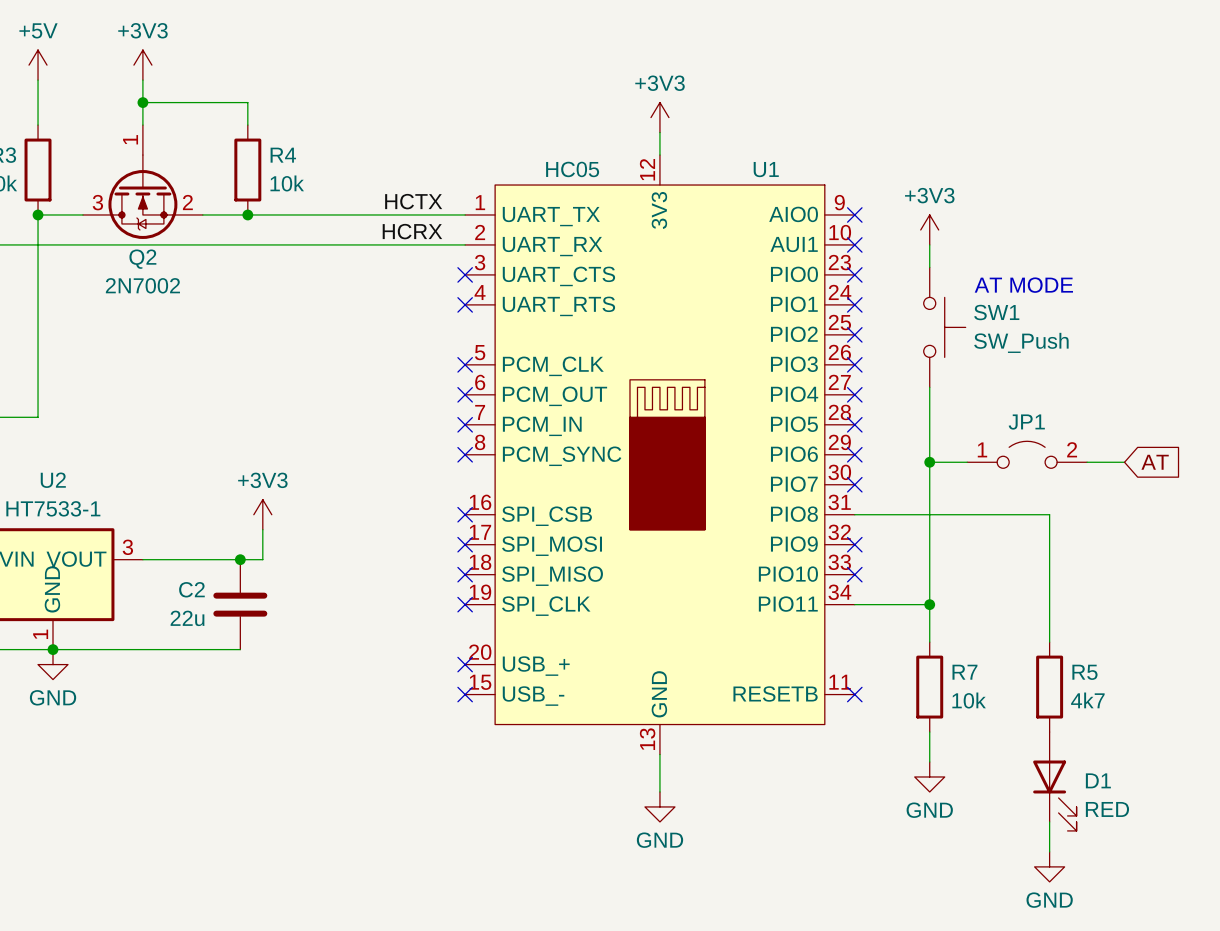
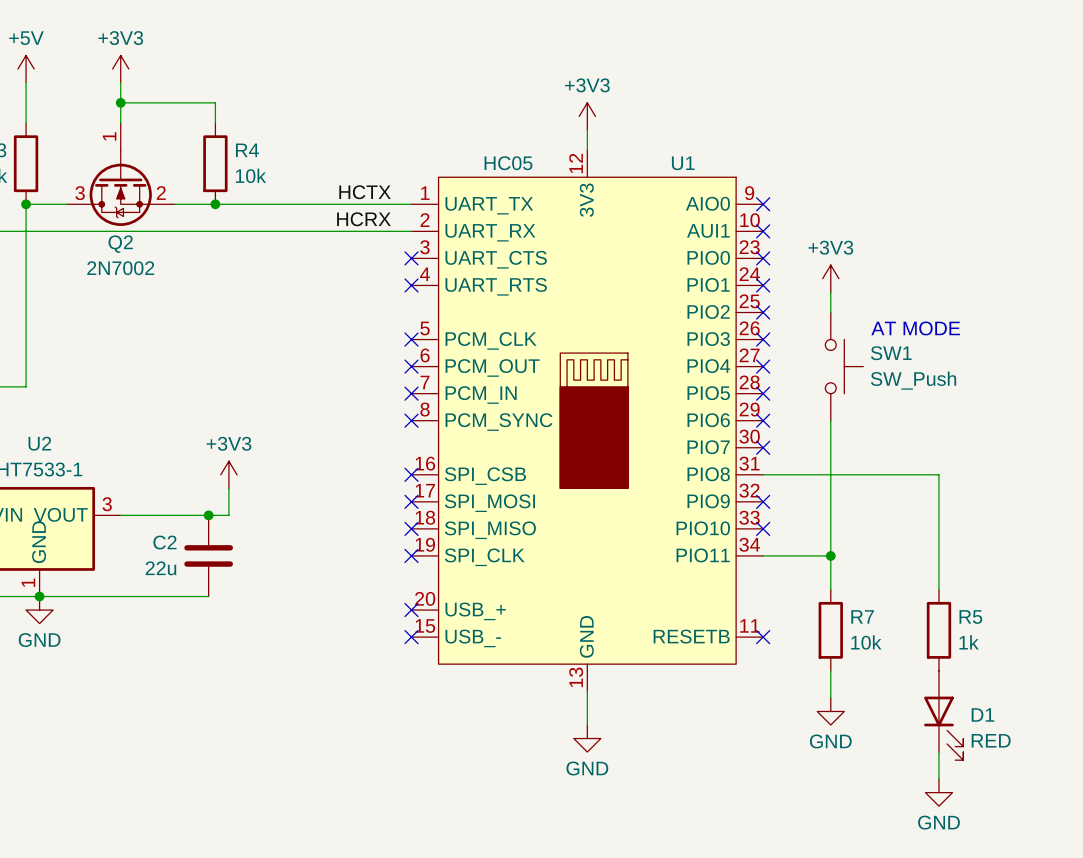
power symbol position: +3V3 (929, 229) -> +3V3 (830, 278)
wire: (929, 244) (929, 267) -> (830, 292) (830, 312)
text position: AT MODE (1023, 285) -> AT MODE (915, 328)
SW1 position: (944, 327) -> (844, 366)
wire: (929, 387) (929, 454) -> none
JP1: (1027, 454) -> none
wire: (929, 462) (967, 462) -> none
junction: (929, 462) -> none
wire: (1087, 462) (1124, 462) -> none
global label: AT (1155, 462) -> none
R5 value: 4k7 (1087, 700) -> 1k (969, 642)

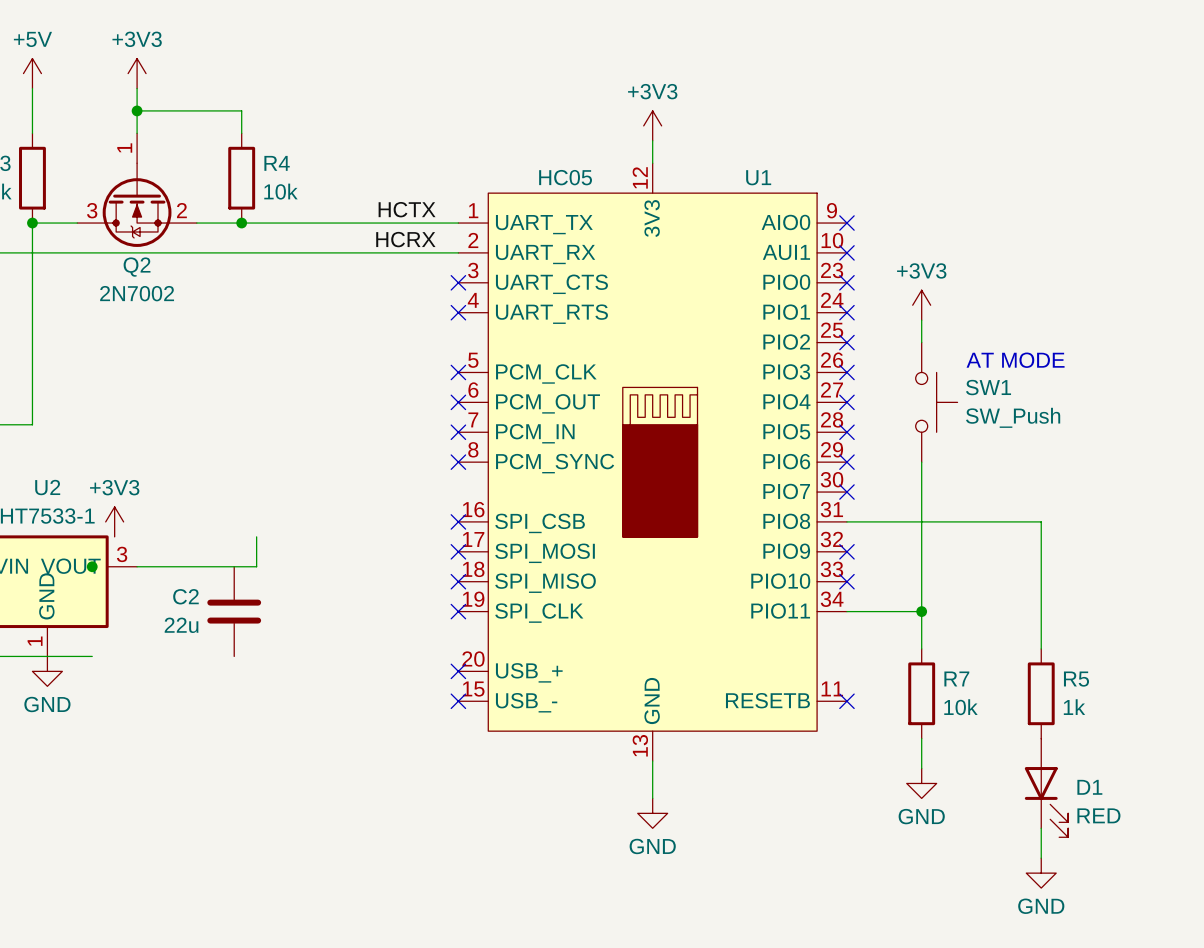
power symbol position: +3V3 (228, 474) -> +3V3 (114, 521)
junction: none -> (92, 566)
junction: (208, 515) -> none
junction: (39, 596) -> none
wire: (80, 596) (208, 596) -> none

